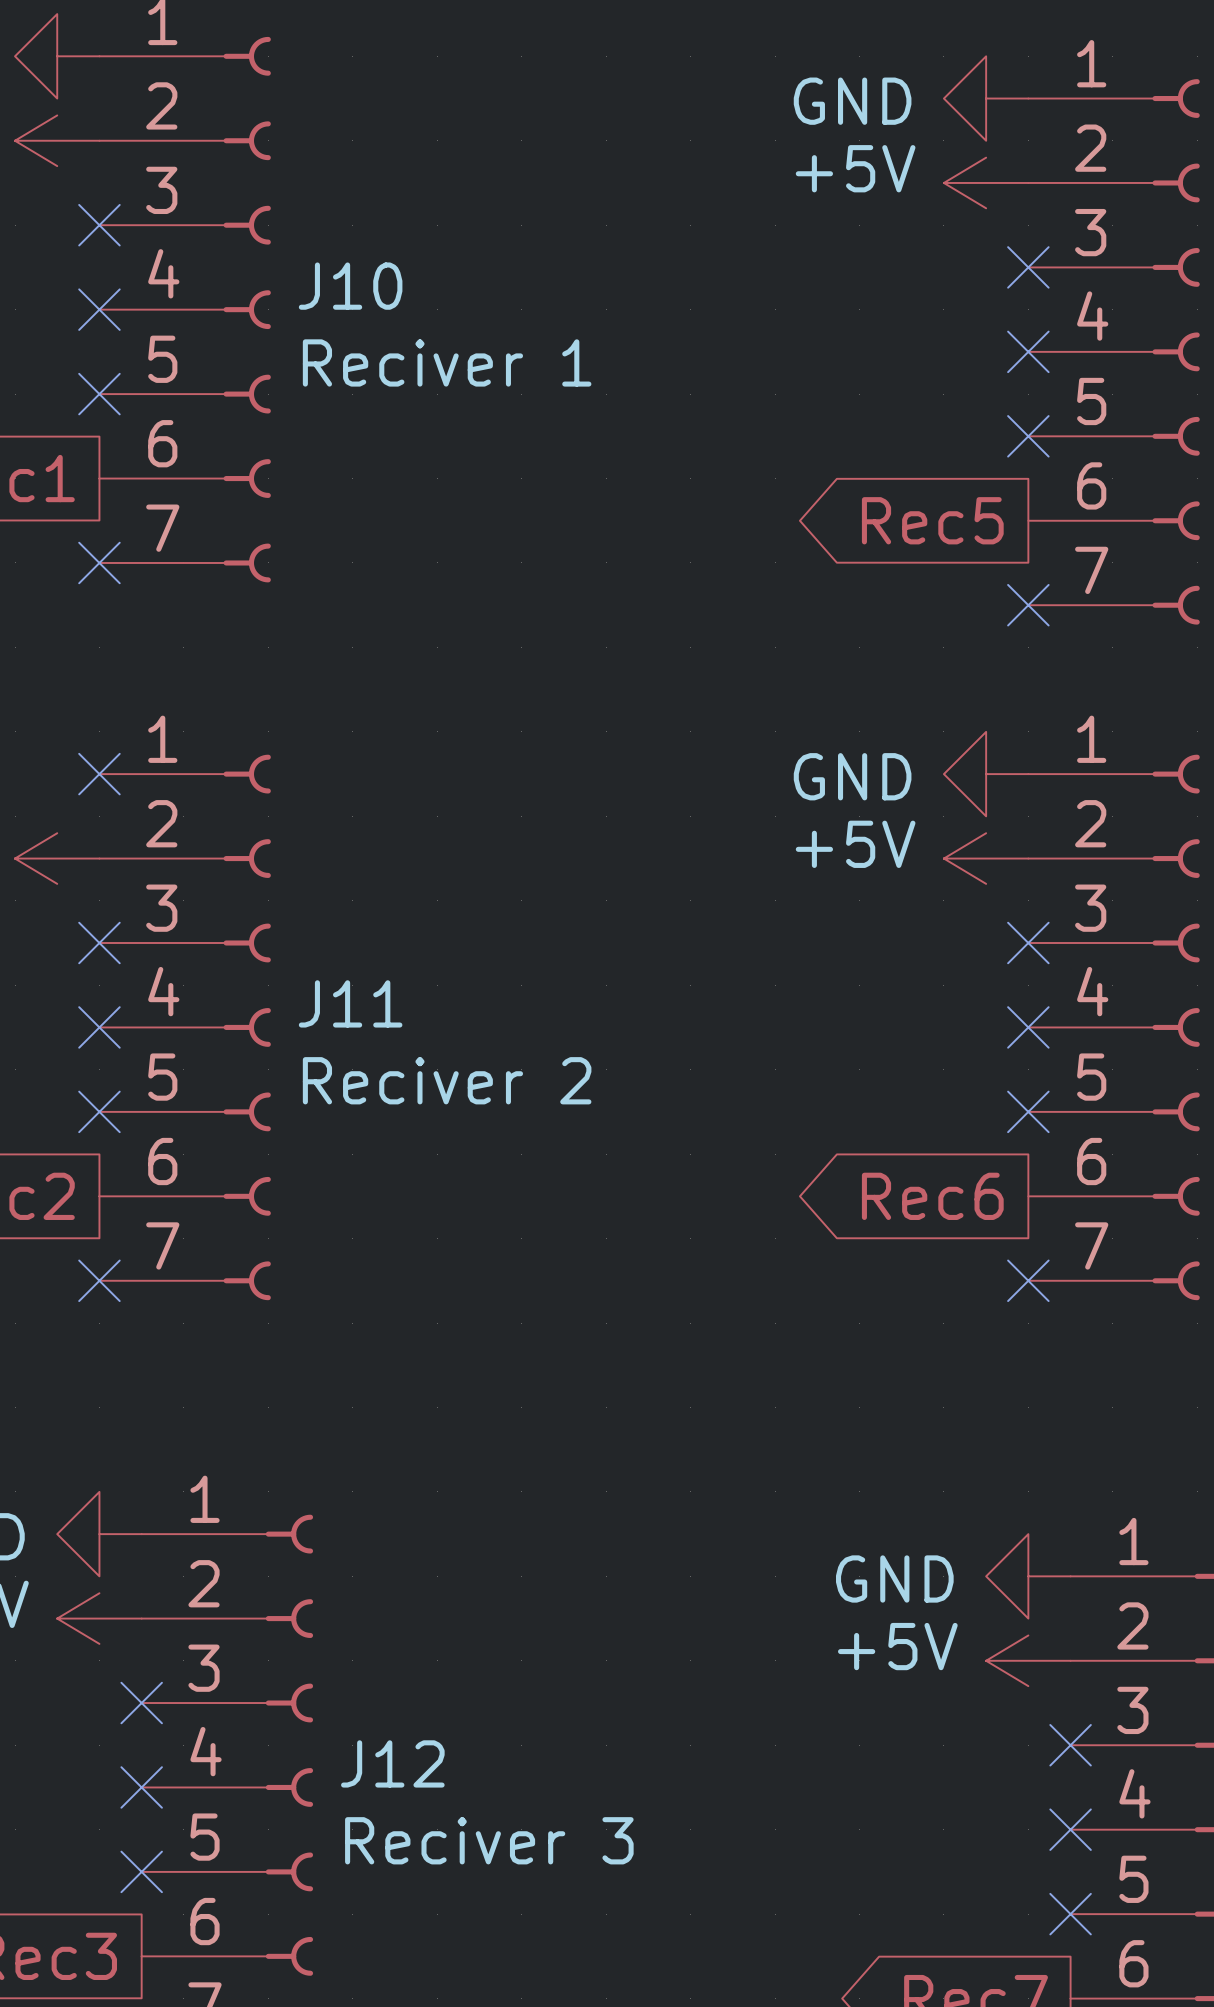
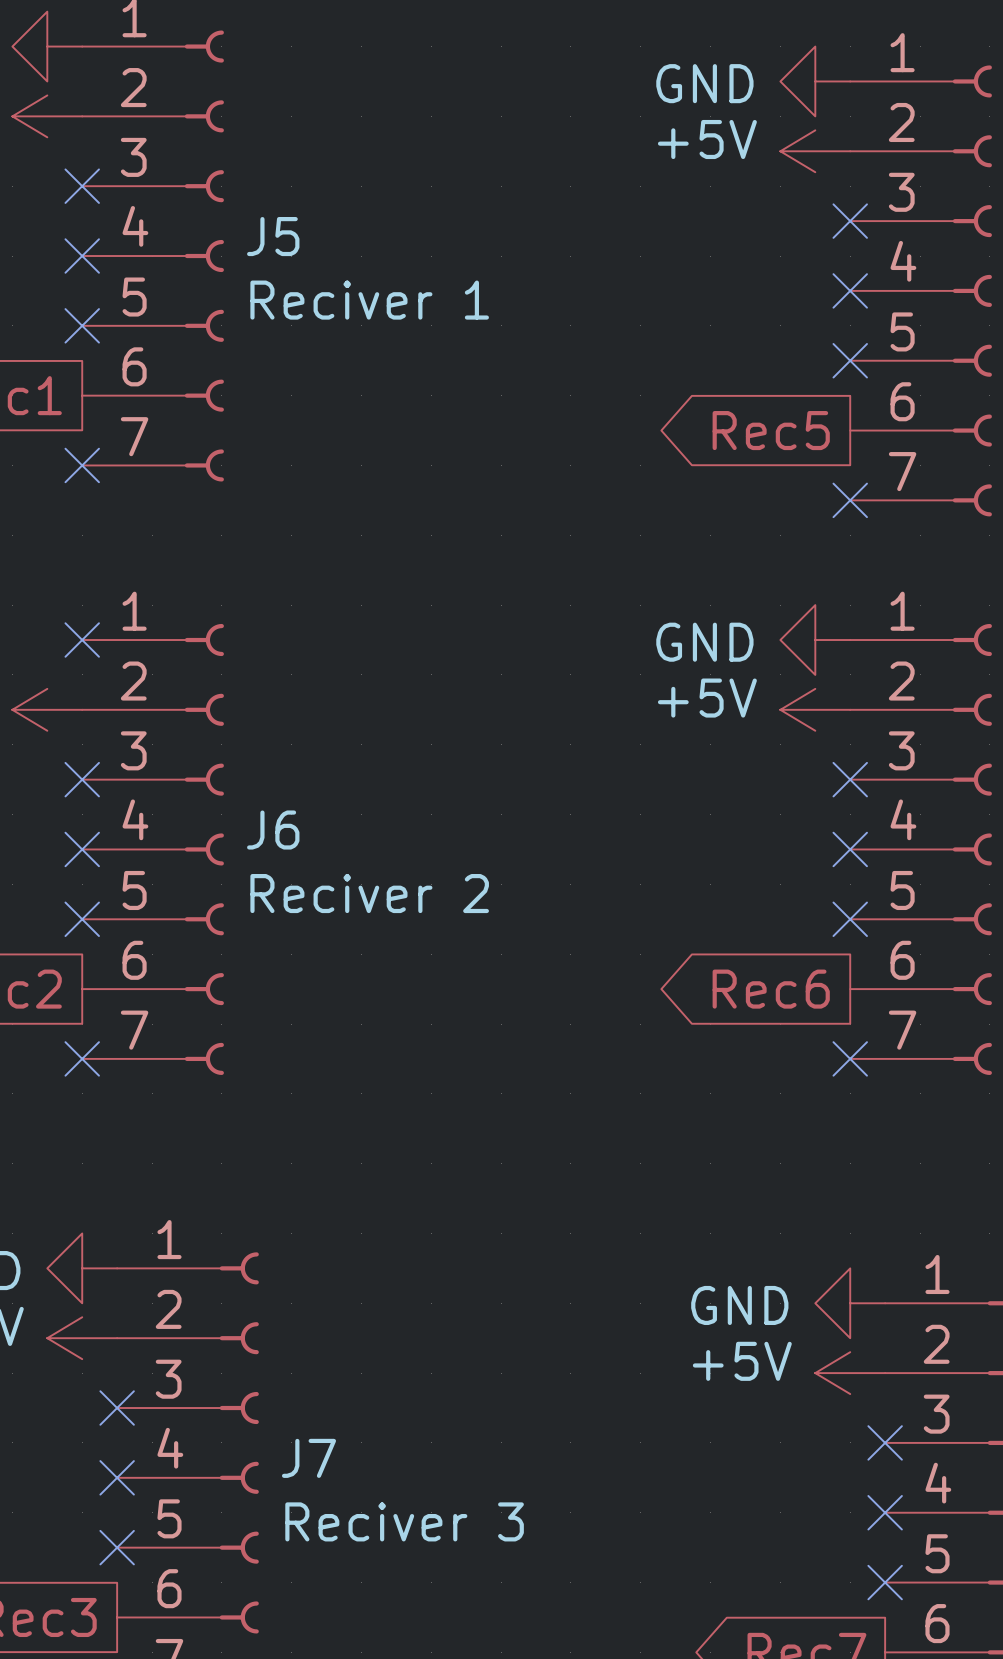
J10 name: J10 (350, 286) -> J5 (273, 236)
J11 name: J11 (350, 1003) -> J6 (273, 830)
J12 name: J12 (392, 1763) -> J7 (308, 1458)

